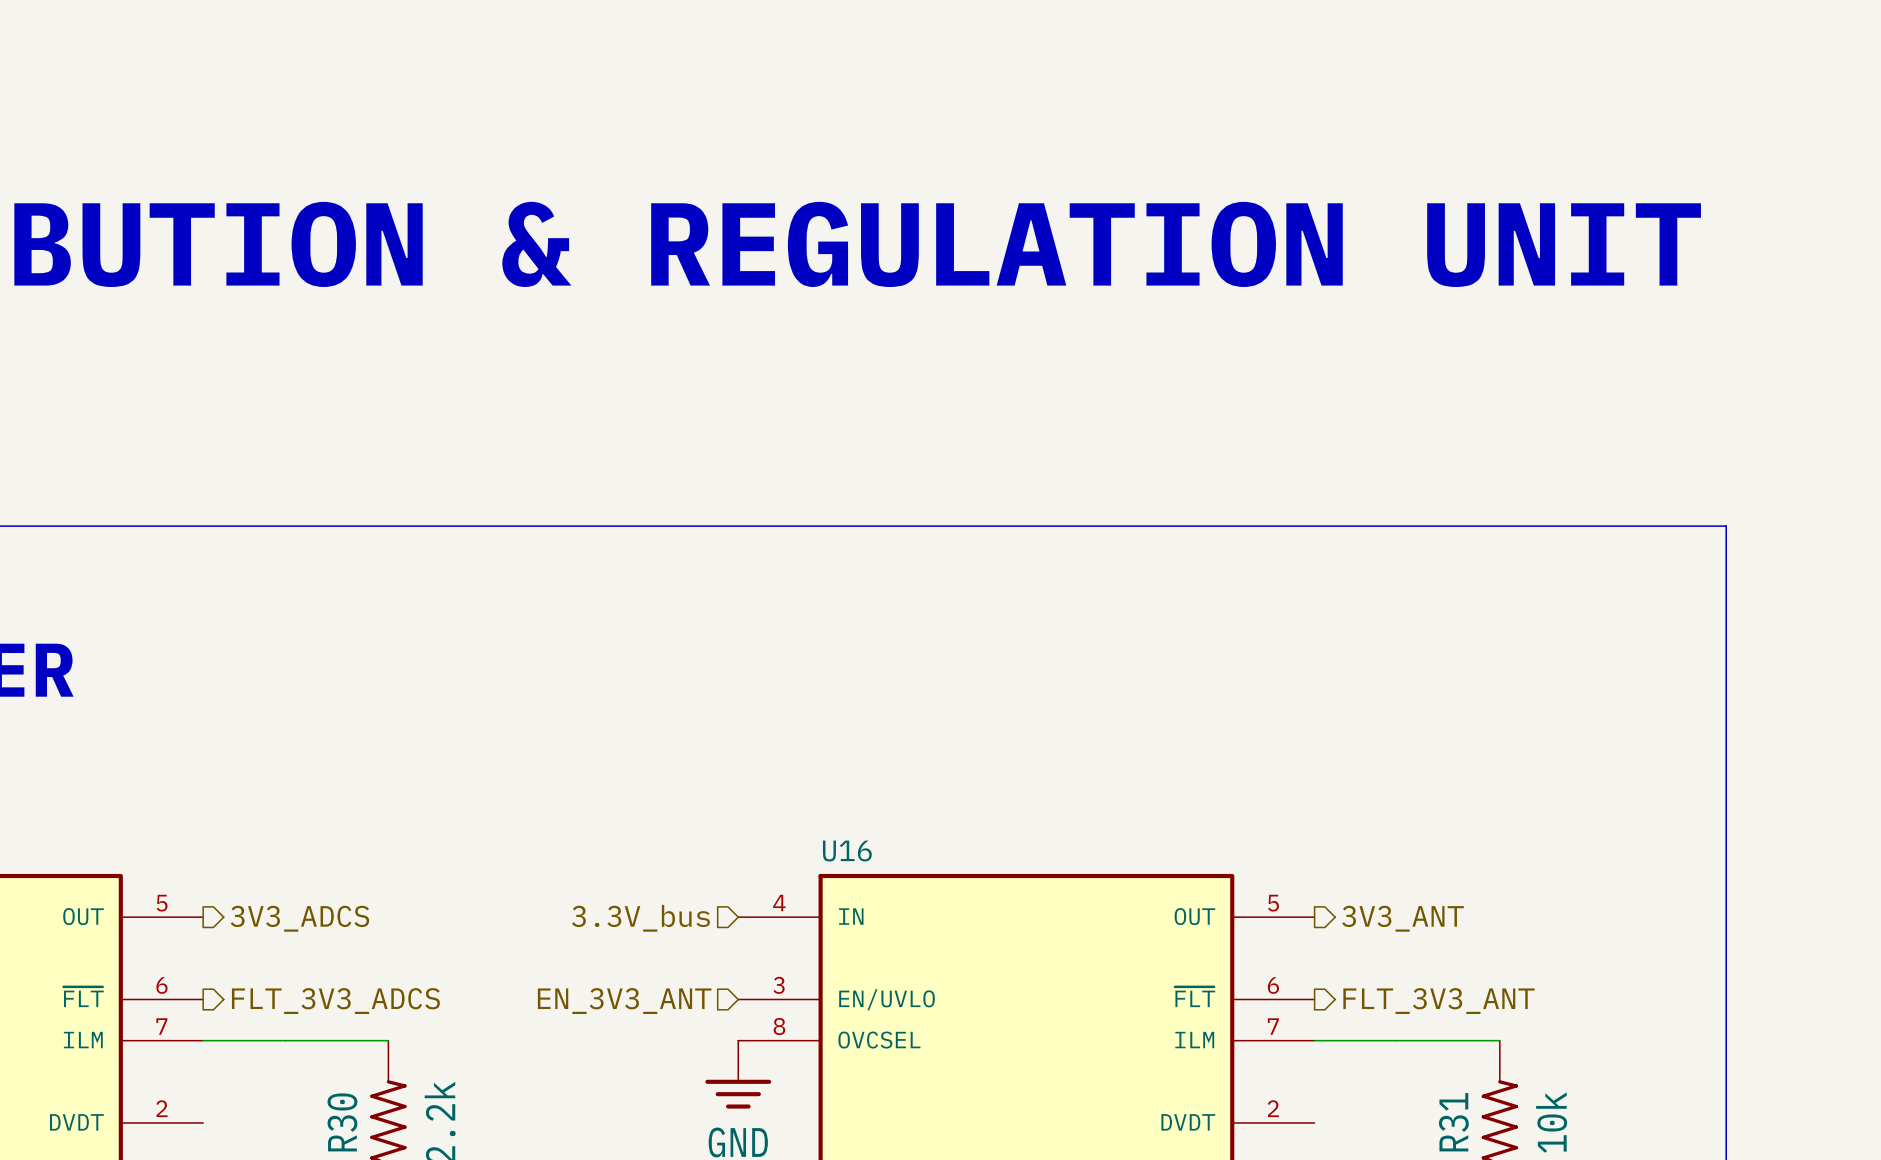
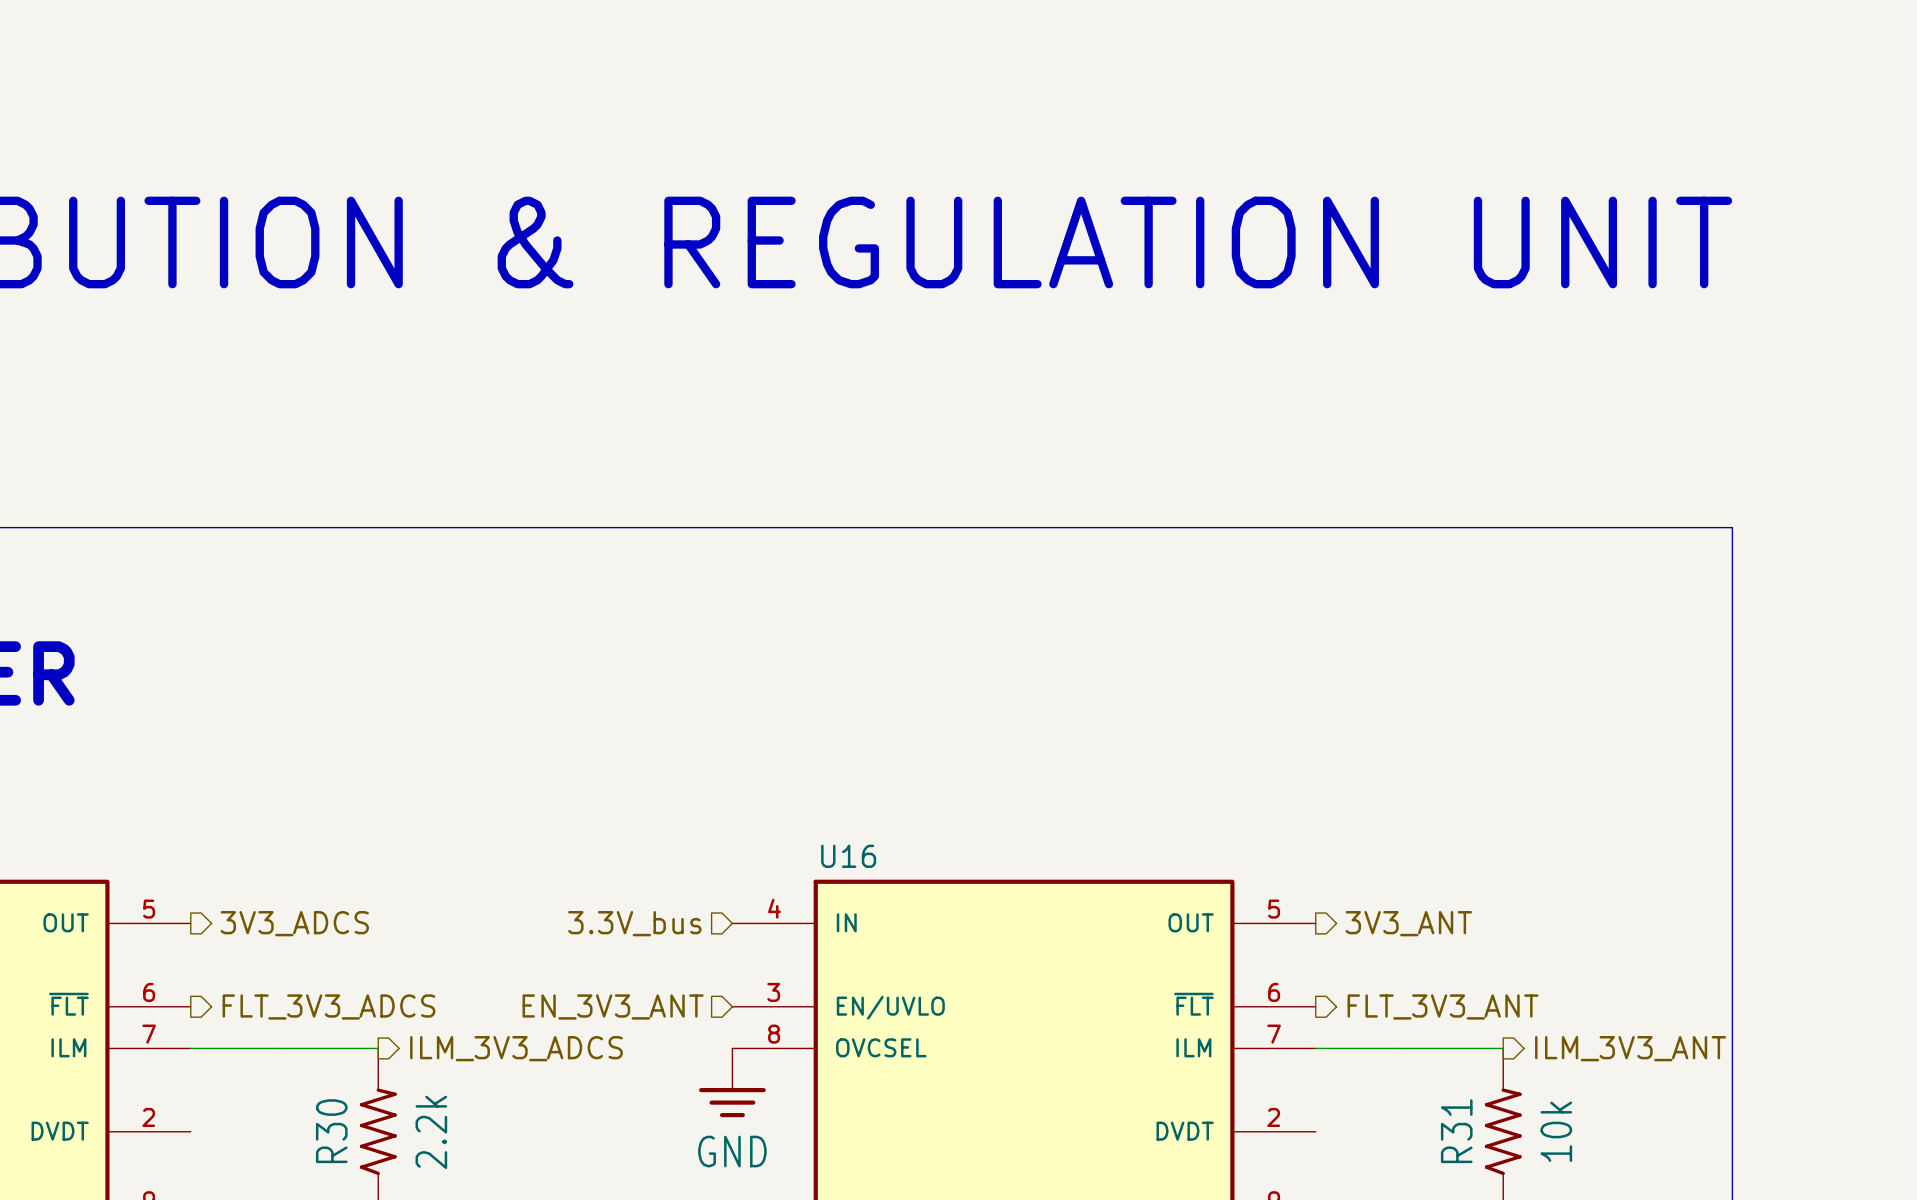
hierarchical label: none -> ILM_3V3_ADCS (516, 1048)
hierarchical label: none -> ILM_3V3_ANT (1630, 1048)

